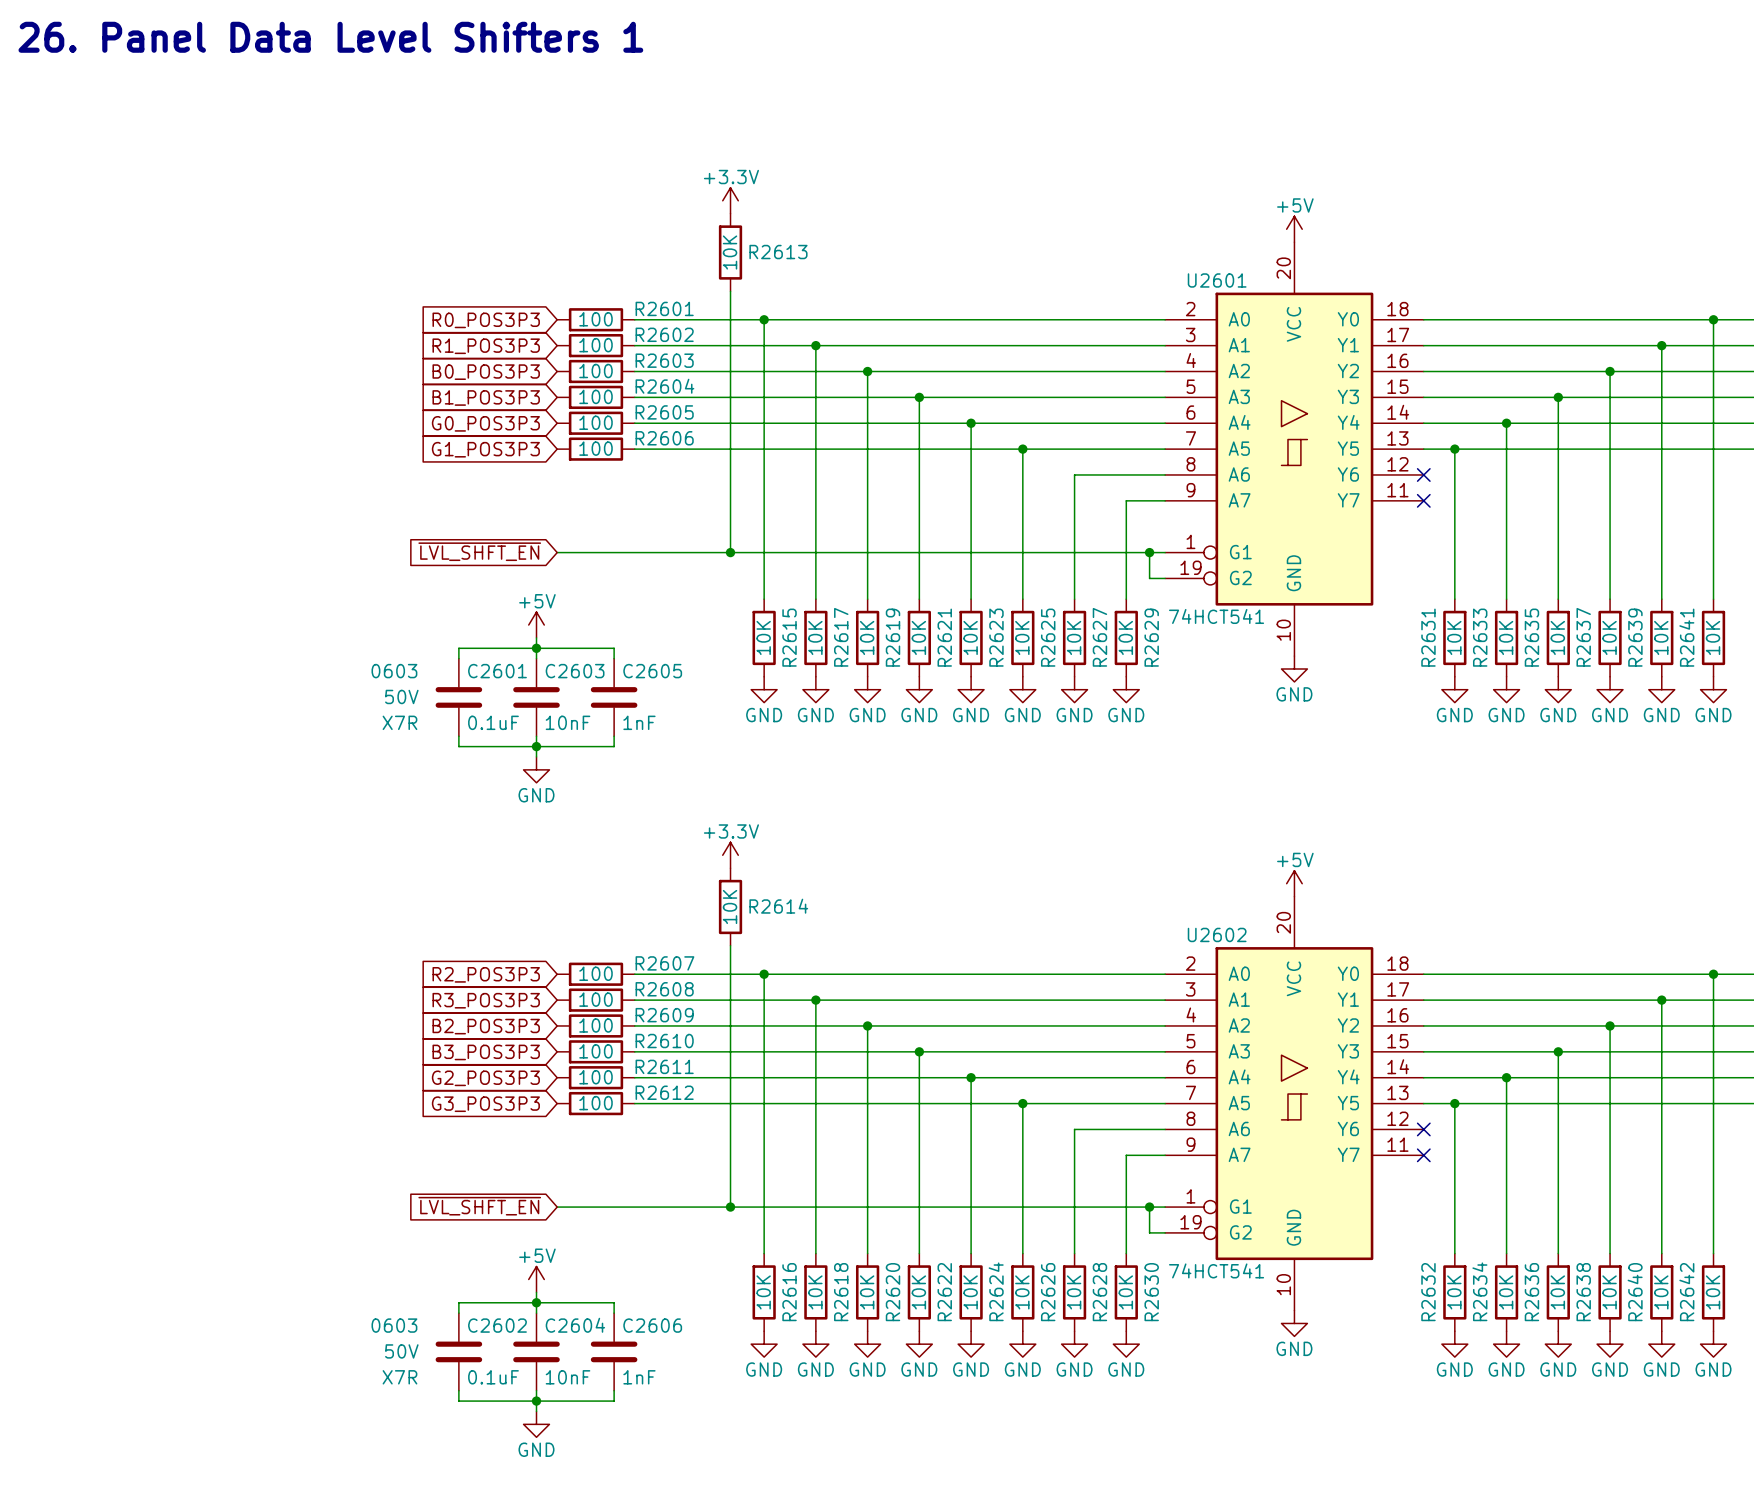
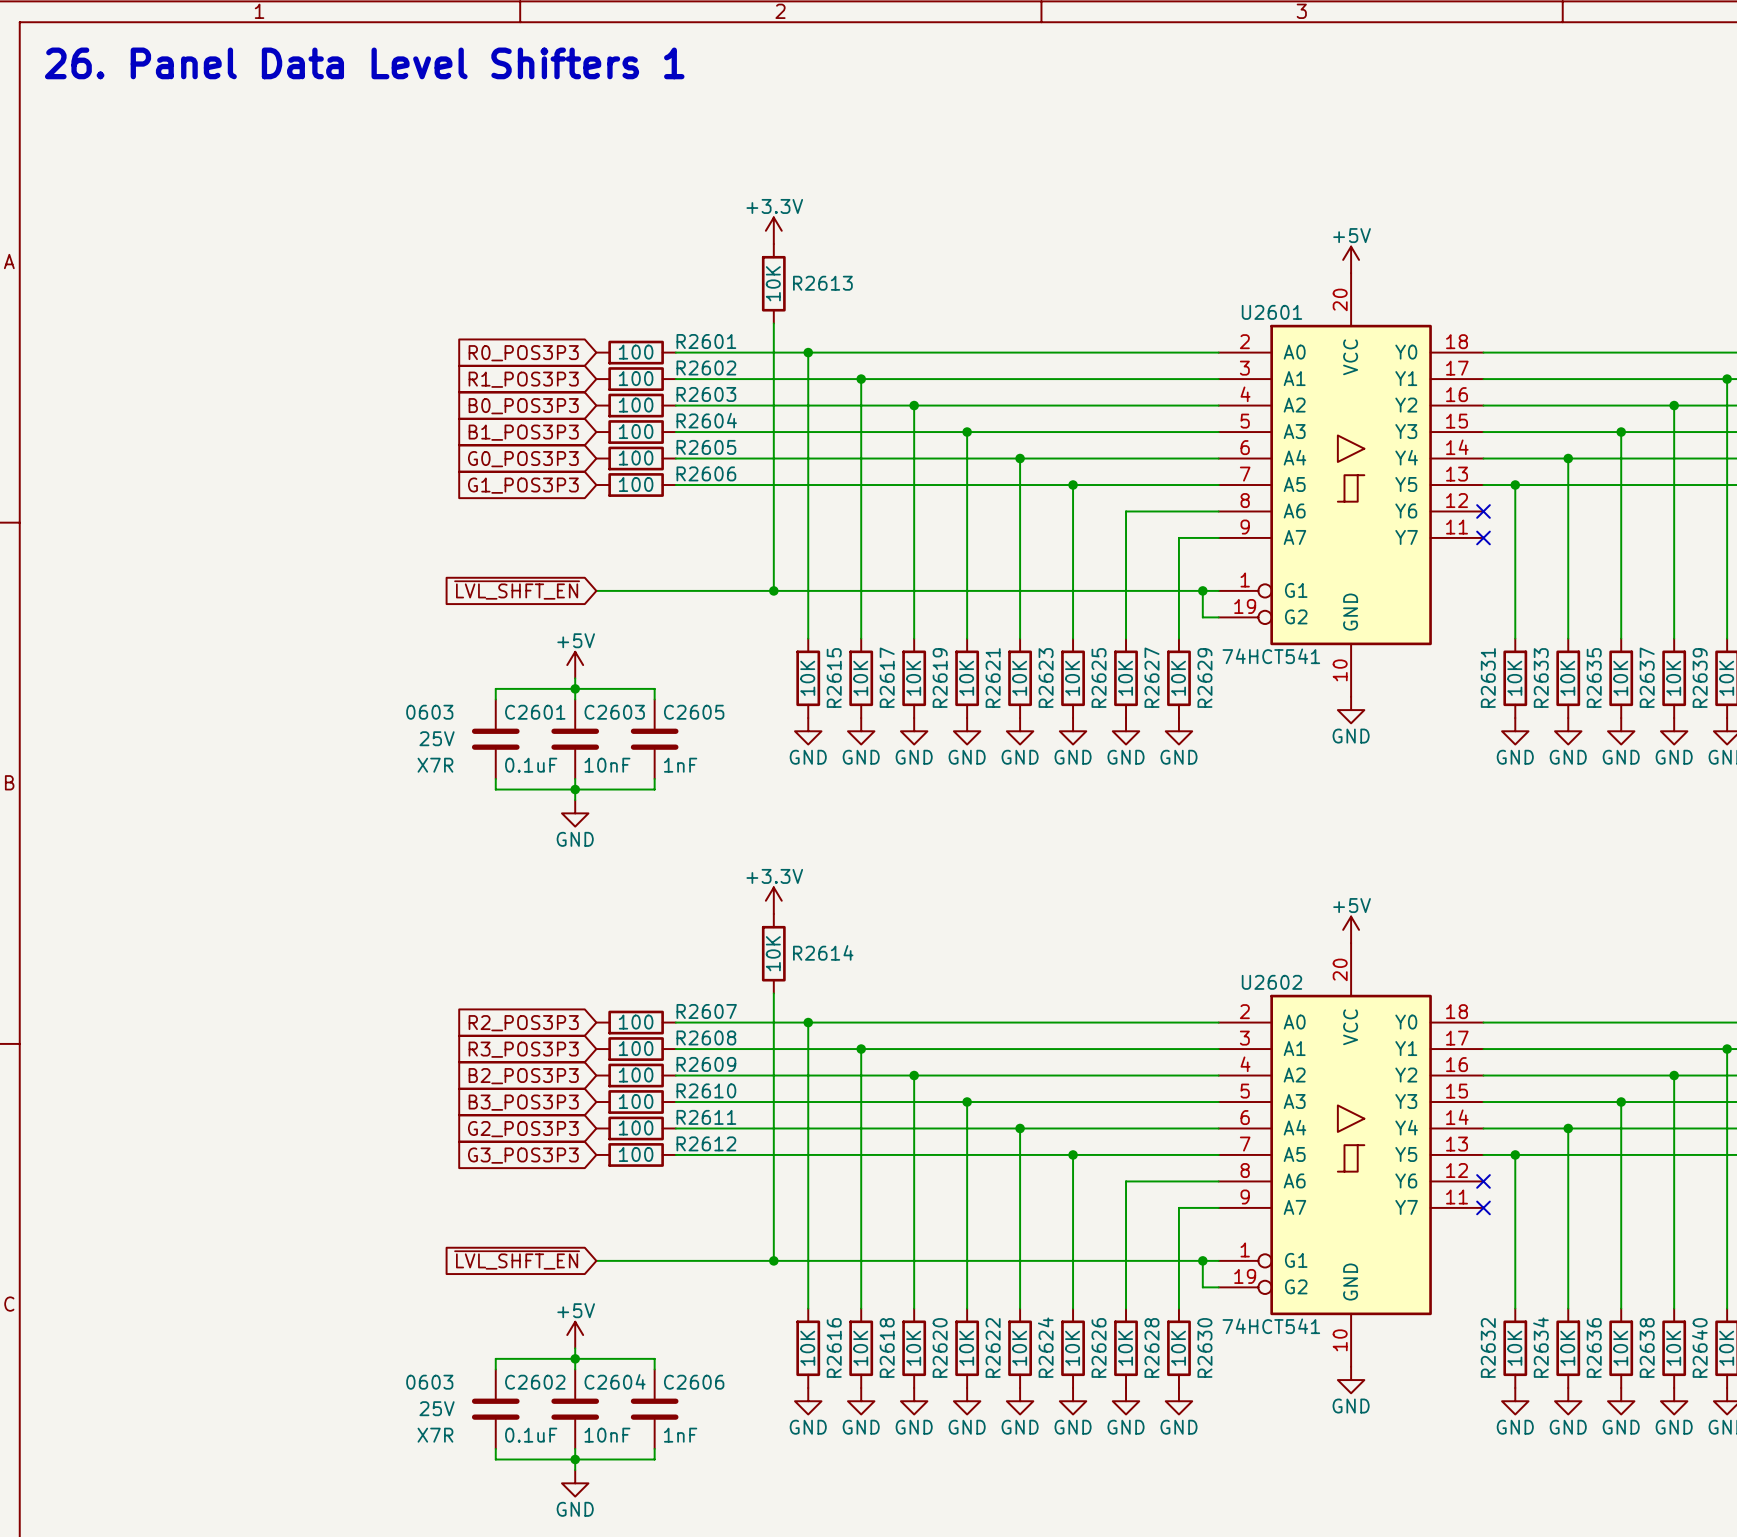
C2601 text: 50V (401, 696) -> 25V (437, 738)
C2602 text: 50V (401, 1351) -> 25V (437, 1408)

